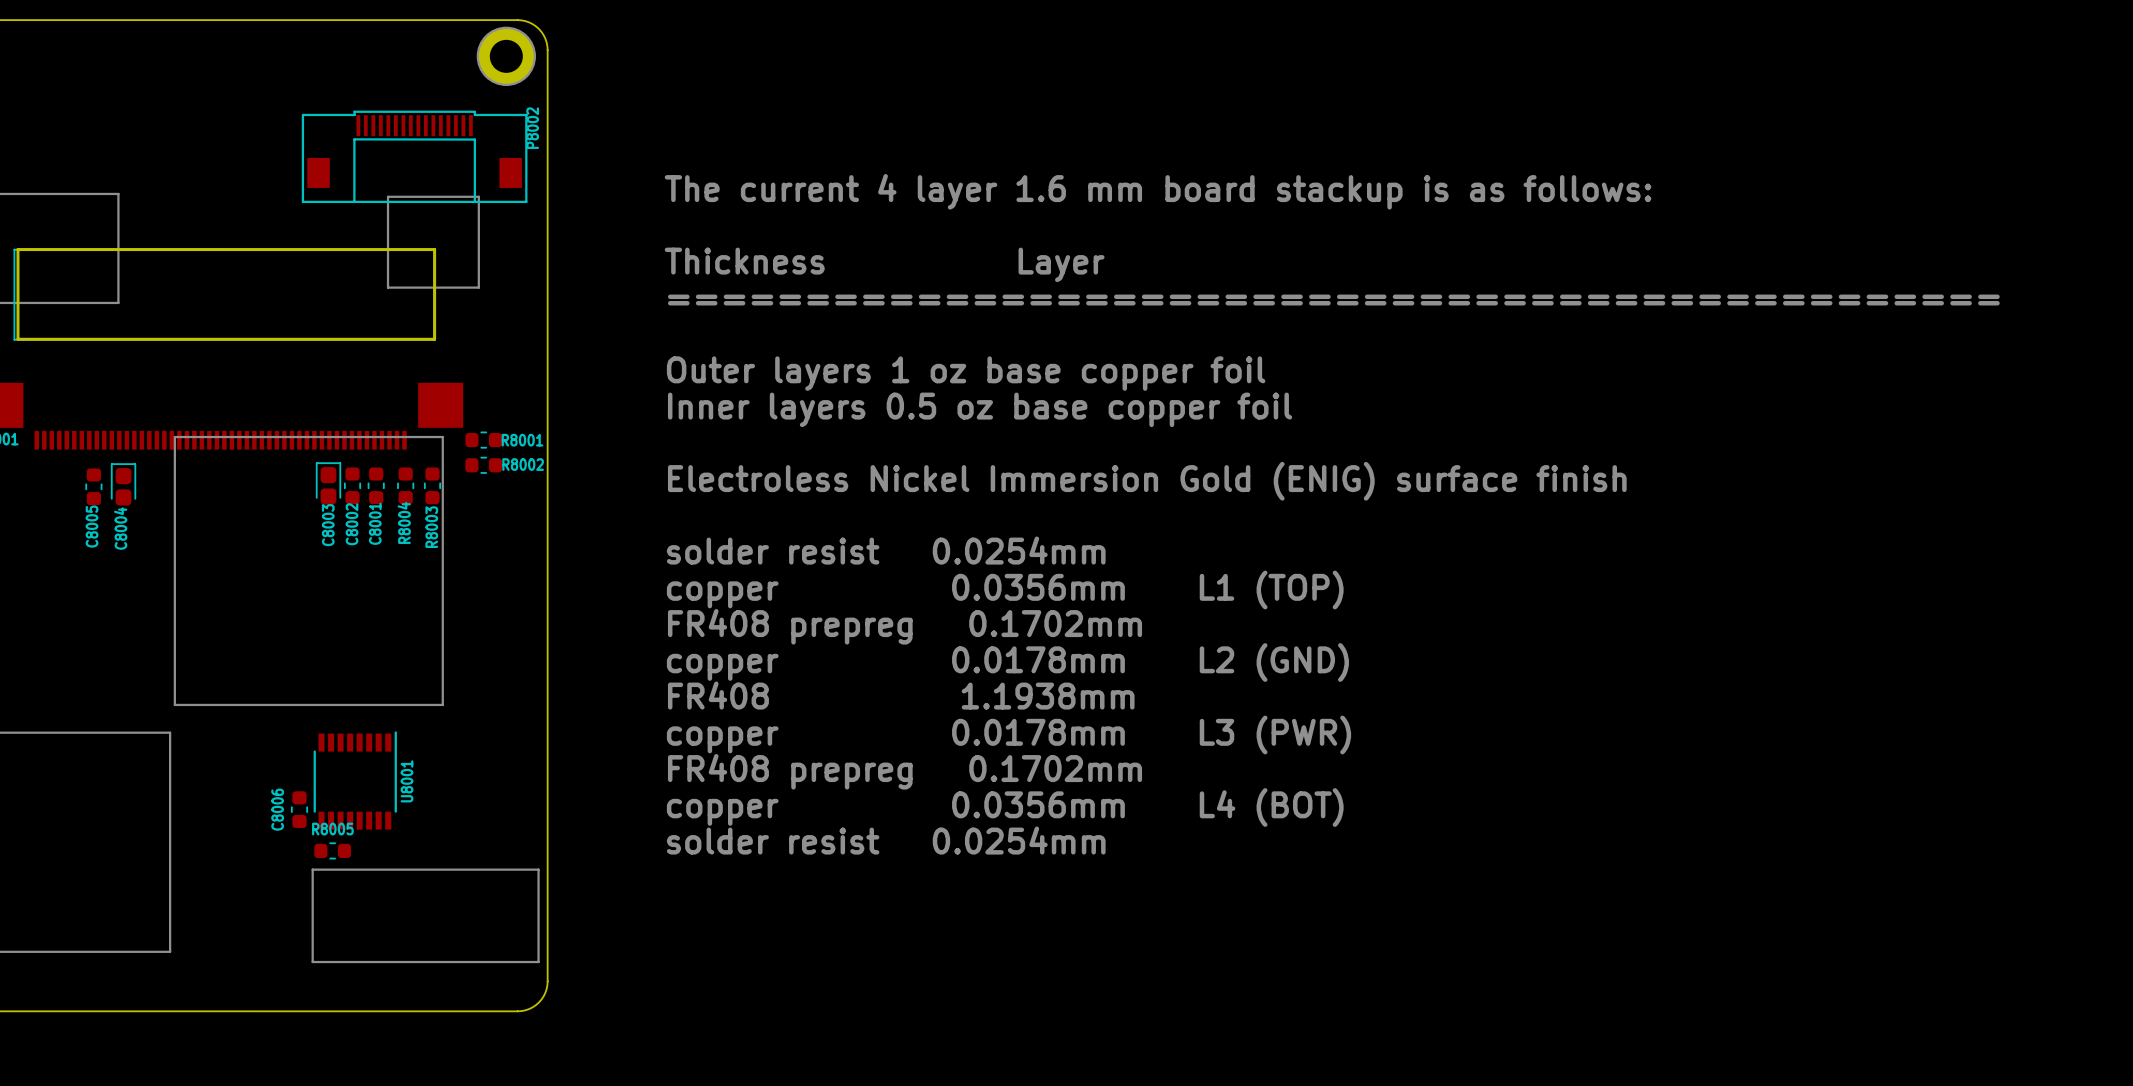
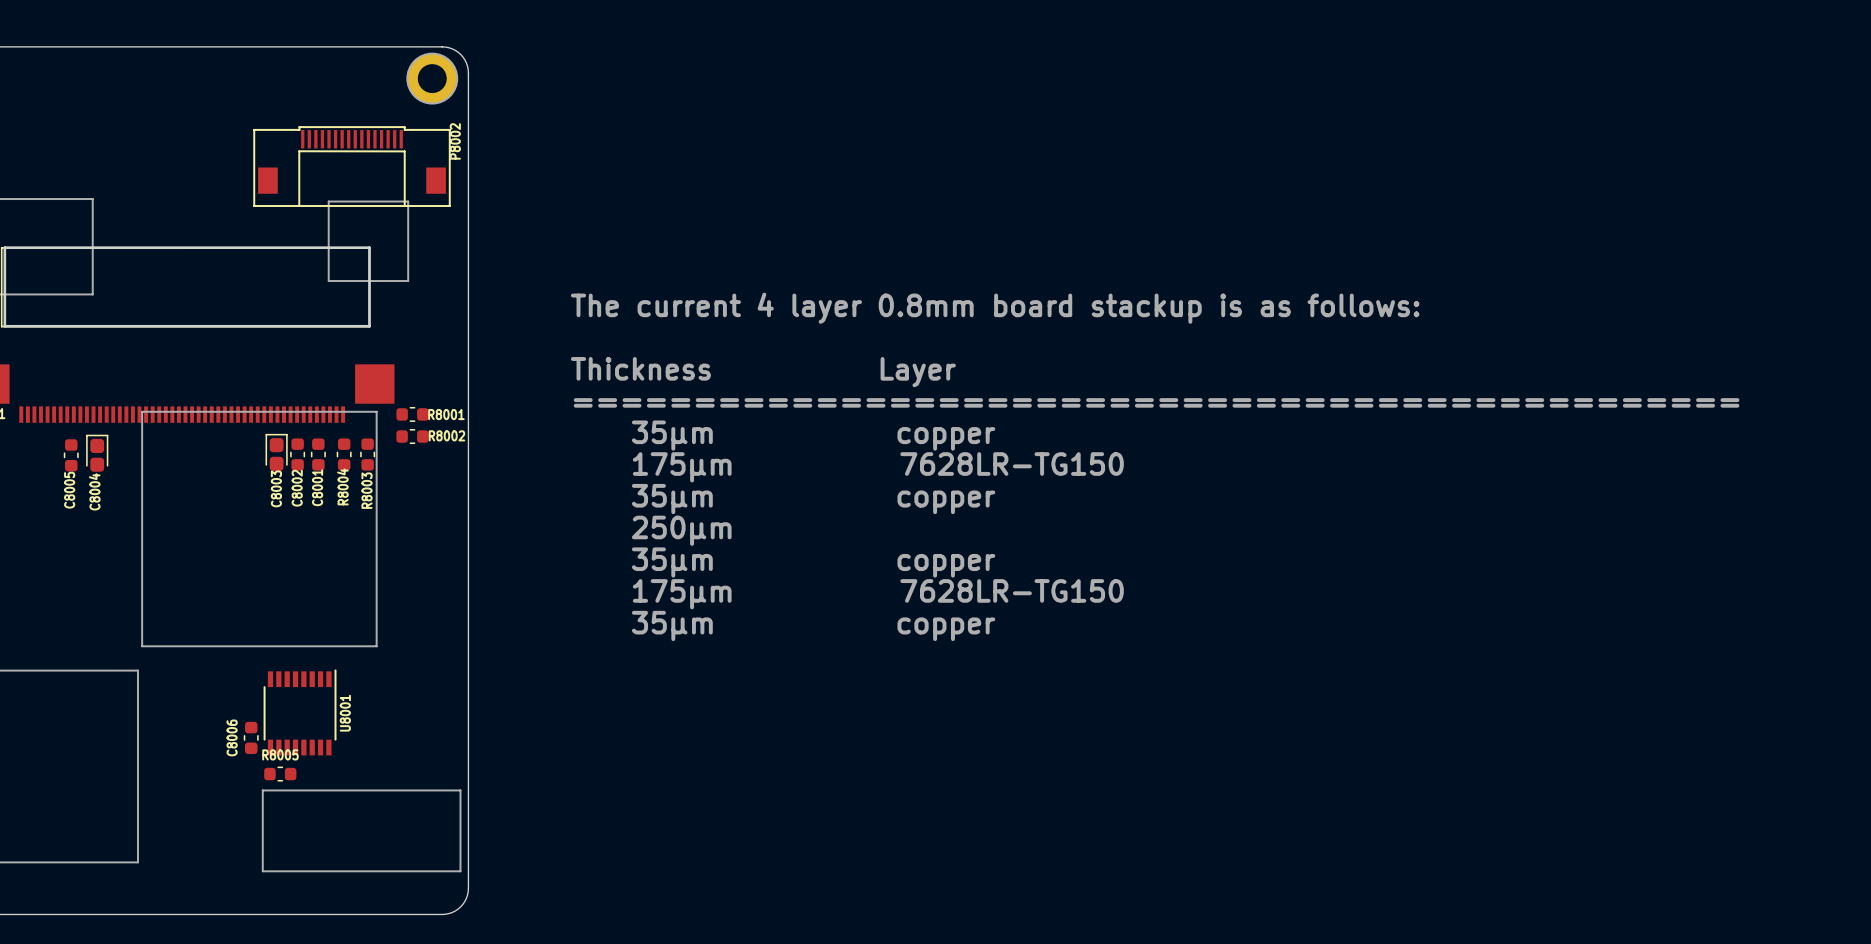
text: The current 4 layer 1.6 mm board stackup is as follows: (1158, 191) -> none
text position: Thickness Layer (884, 264) -> Thickness Layer (763, 372)
text position: ================================================ (1333, 300) -> ================================================ (1156, 402)
text: none -> The current 4 layer 0.8mm board stackup is as follows: (995, 308)
text: Outer layers 1 oz base copper foil (966, 373) -> none
text: Inner layers 0.5 oz base copper foil (980, 409) -> none
text: none -> 35µm copper (813, 435)
text: Electroless Nickel Immersion Gold (ENIG) surface finish (1147, 481) -> none
text: none -> 175µm 7628LR-TG150 (878, 467)
text: none -> 35µm copper (813, 499)
text: solder resist 0.0254mm (886, 550) -> none
text: none -> 250µm (681, 530)
text: copper 0.0356mm L1 (TOP) (1005, 590) -> none
text: none -> 35µm copper (813, 562)
text: FR408 prepreg 0.1702mm (905, 626) -> none
text: none -> 175µm 7628LR-TG150 (878, 594)
text: copper 0.0178mm L2 (GND) (1007, 662) -> none
text: none -> 35µm copper (813, 625)
text: FR408 1.1938mm (901, 695) -> none
text: copper 0.0178mm L3 (PWR) (1009, 735) -> none
text: FR408 prepreg 0.1702mm (905, 771) -> none
text: copper 0.0356mm L4 (BOT) (1005, 807) -> none
text: solder resist 0.0254mm (886, 840) -> none

